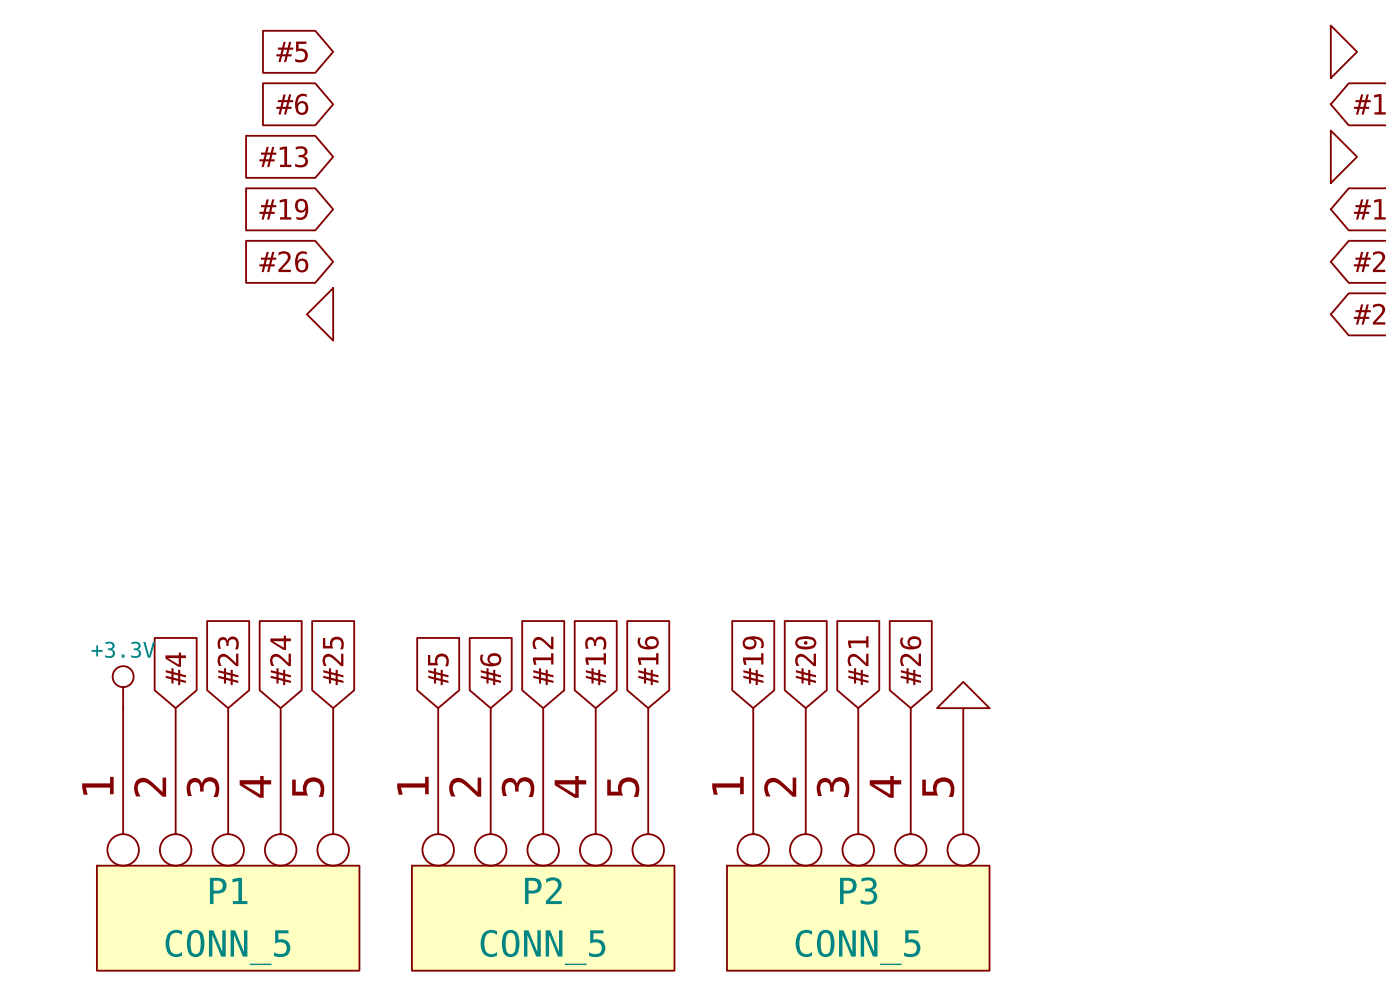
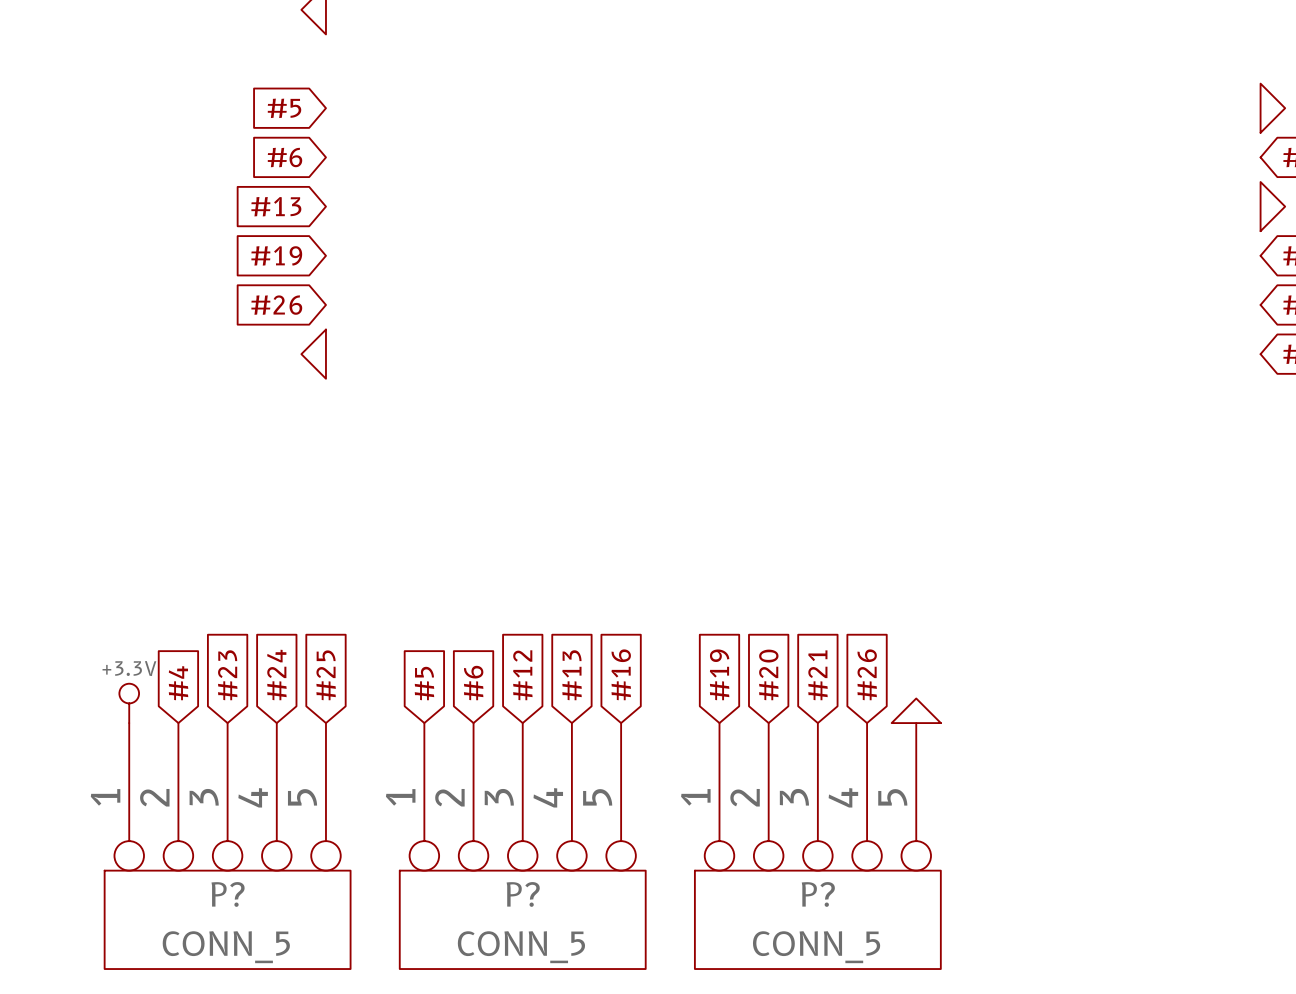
P1 name: P1 (228, 890) -> P? (228, 894)
P2 name: P2 (543, 890) -> P? (523, 894)
P3 name: P3 (858, 890) -> P? (818, 894)

